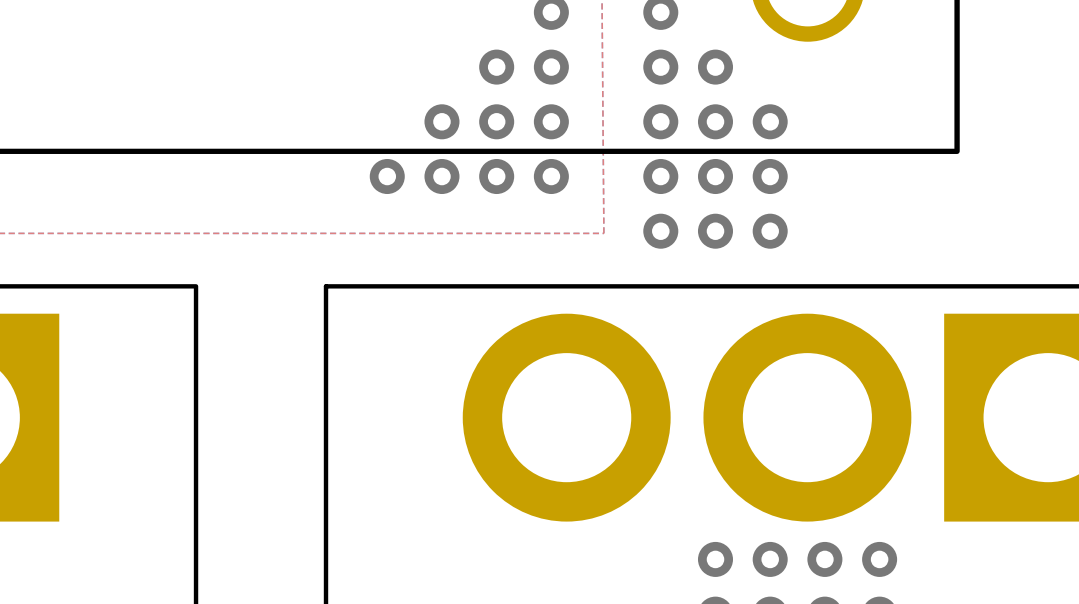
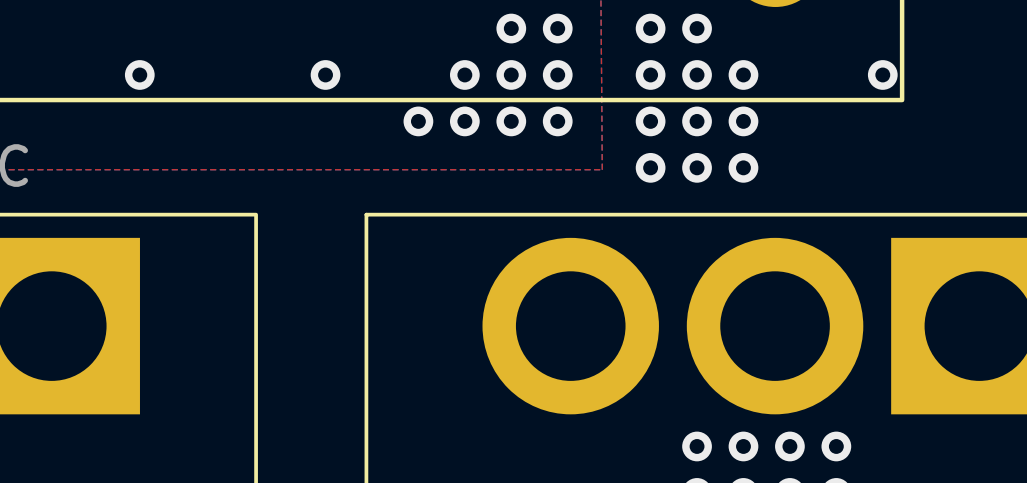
via: none -> (139, 74)
via: none -> (325, 74)
via: none -> (882, 74)

